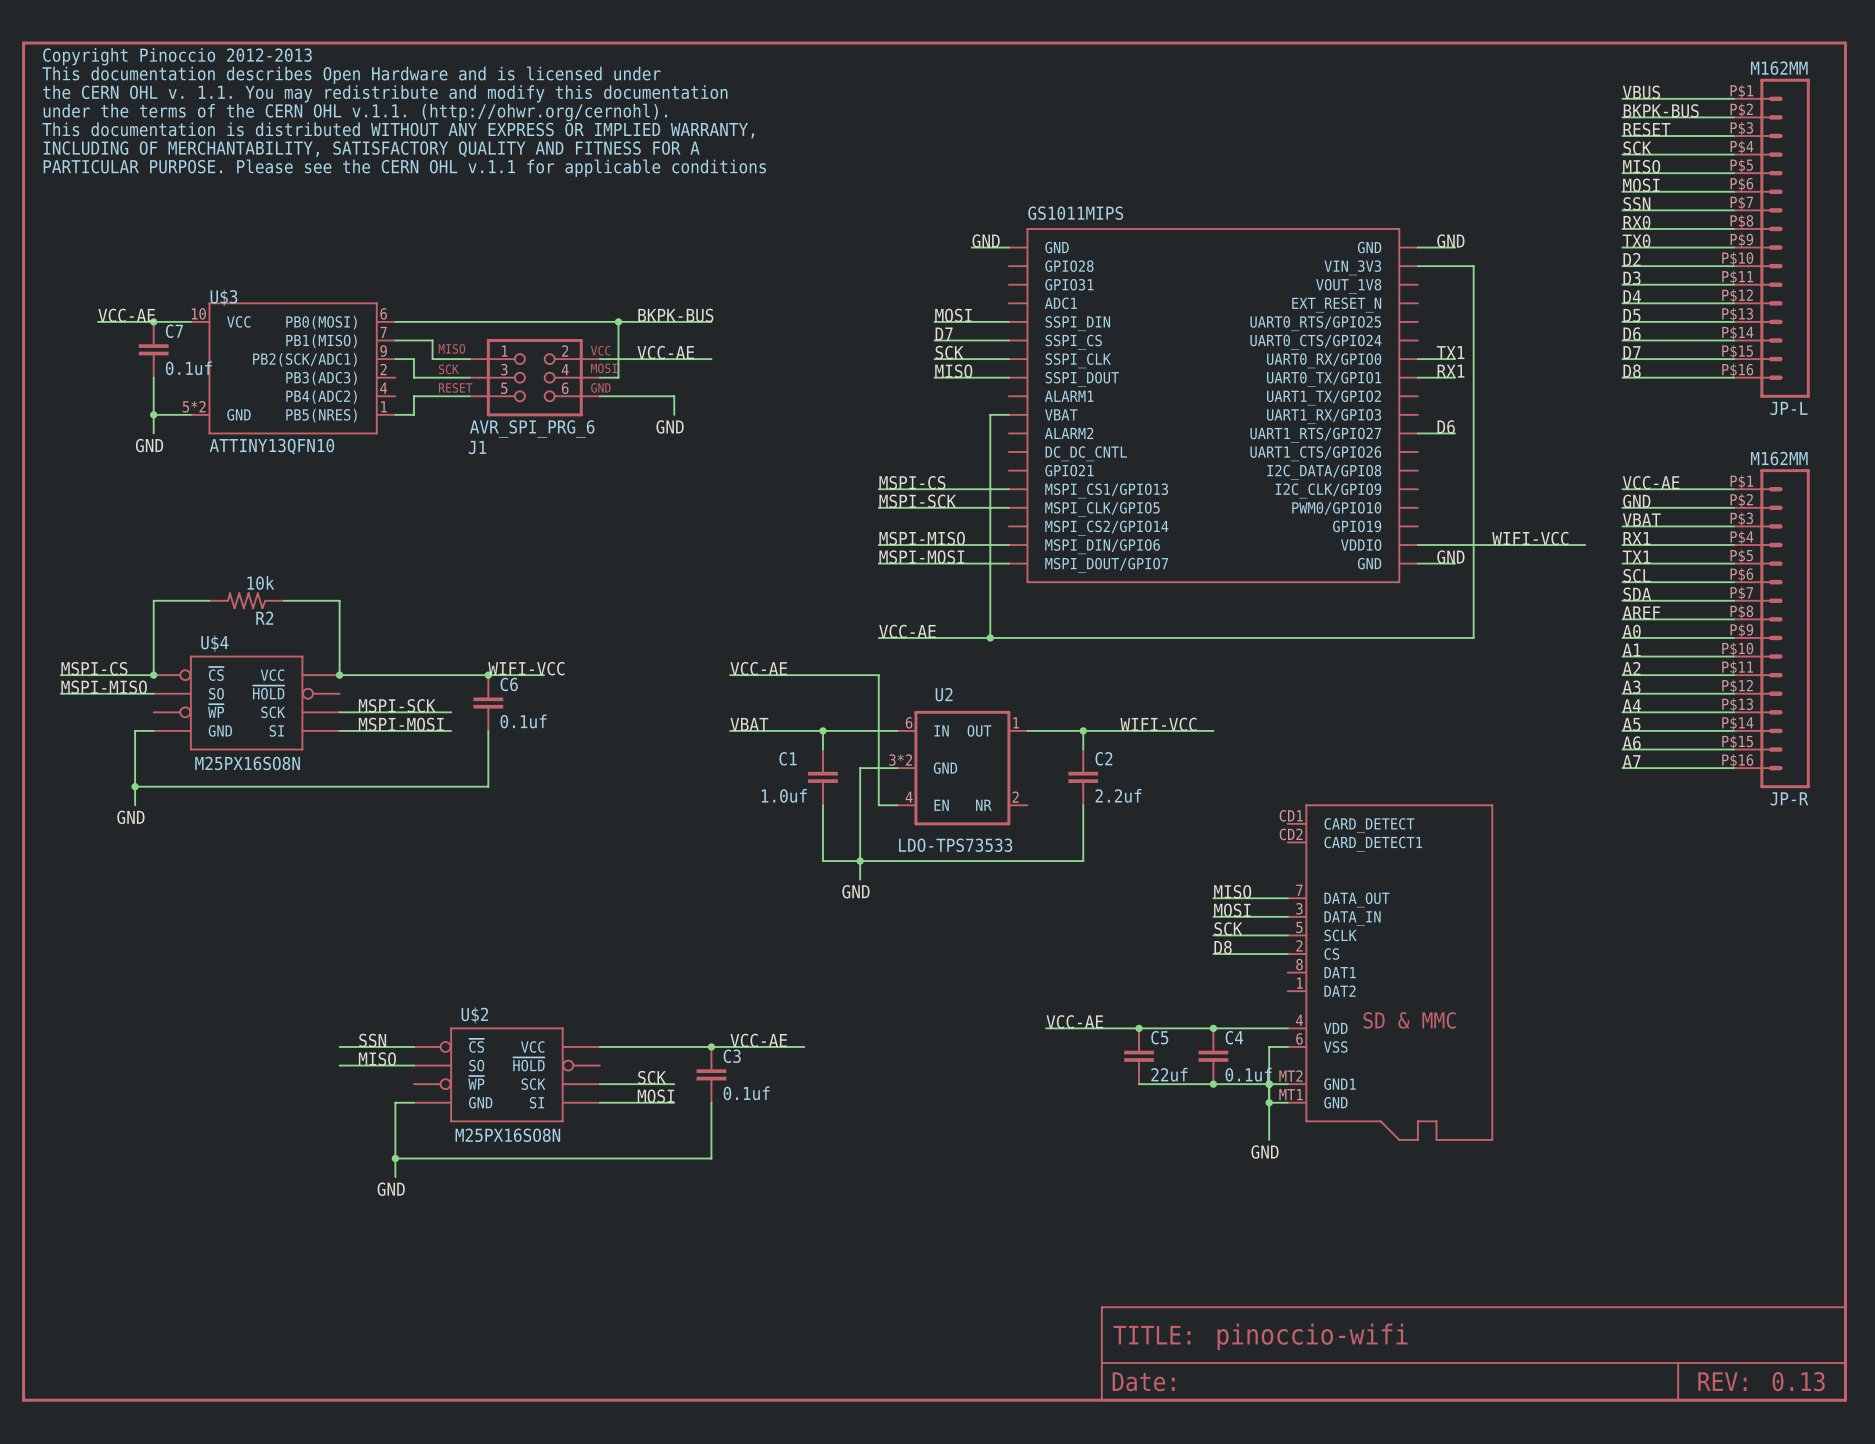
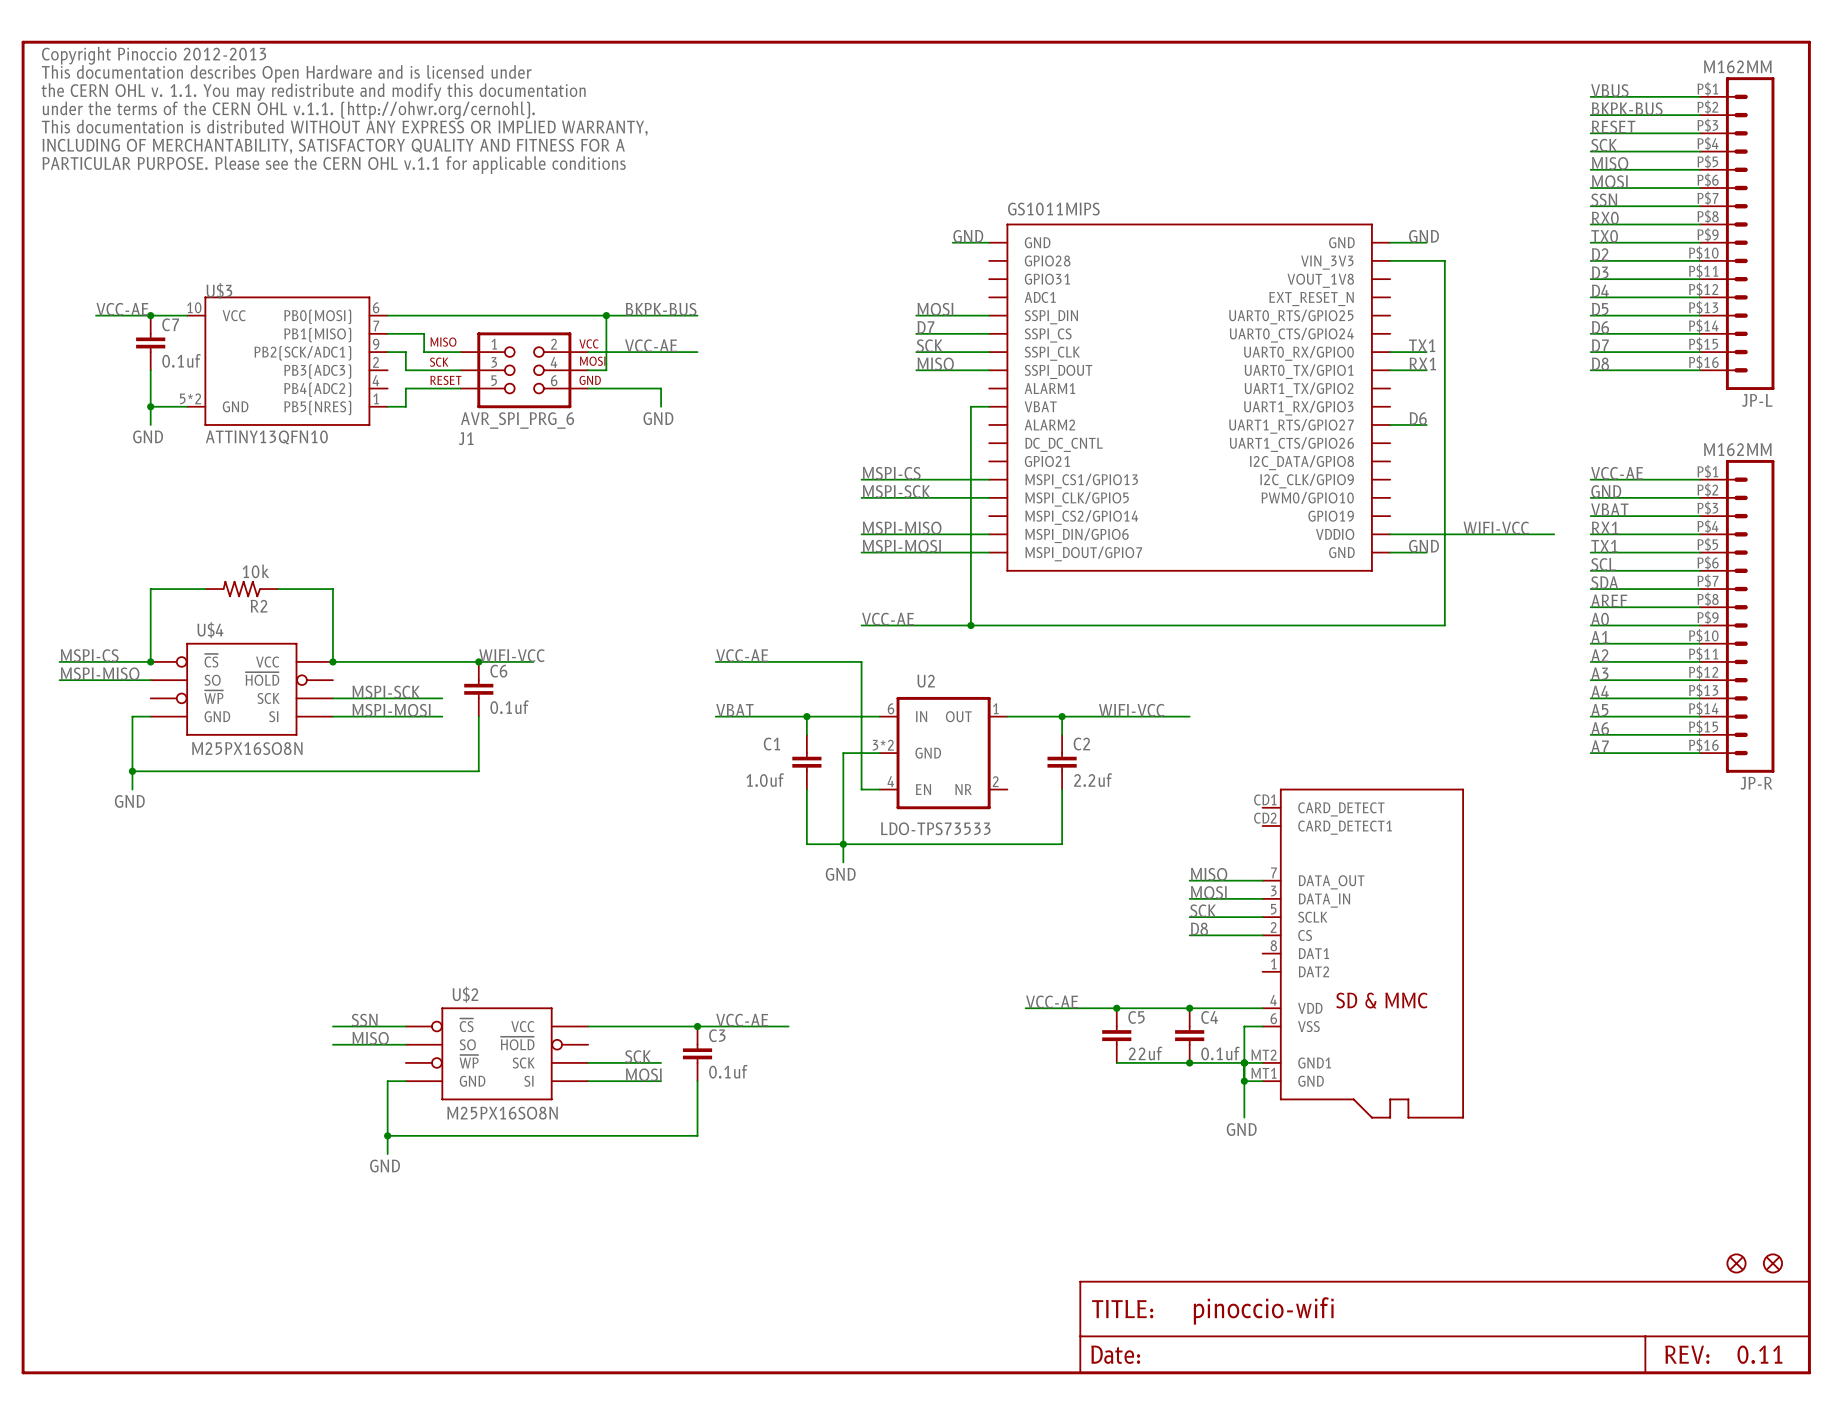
part: none -> (1736, 1263)
part: none -> (1772, 1263)
text: 0.13 (1798, 1381) -> 0.11 (1759, 1354)

